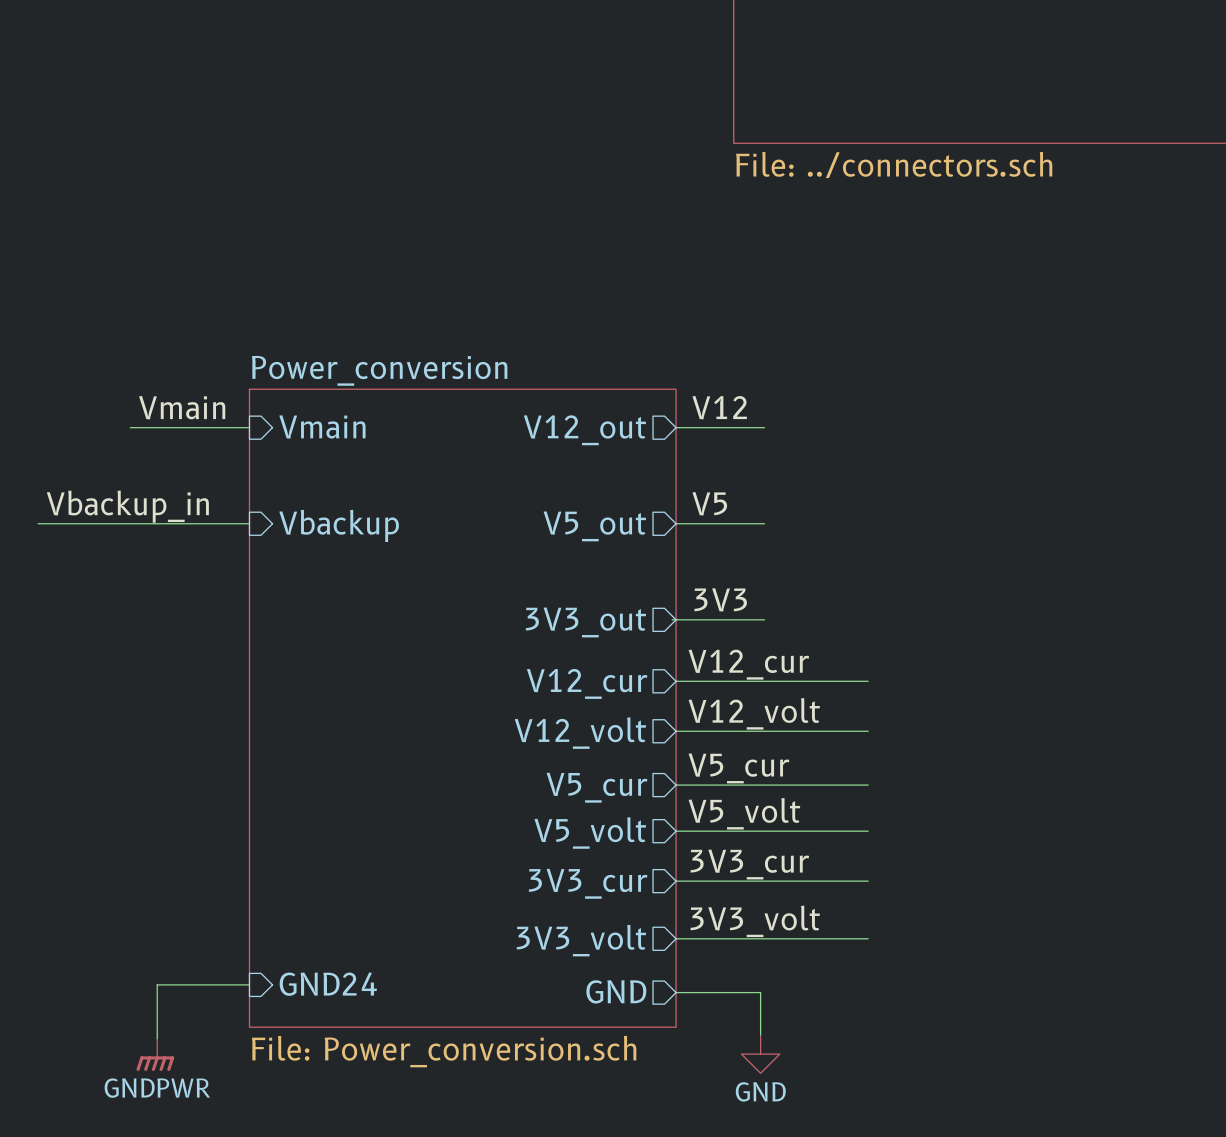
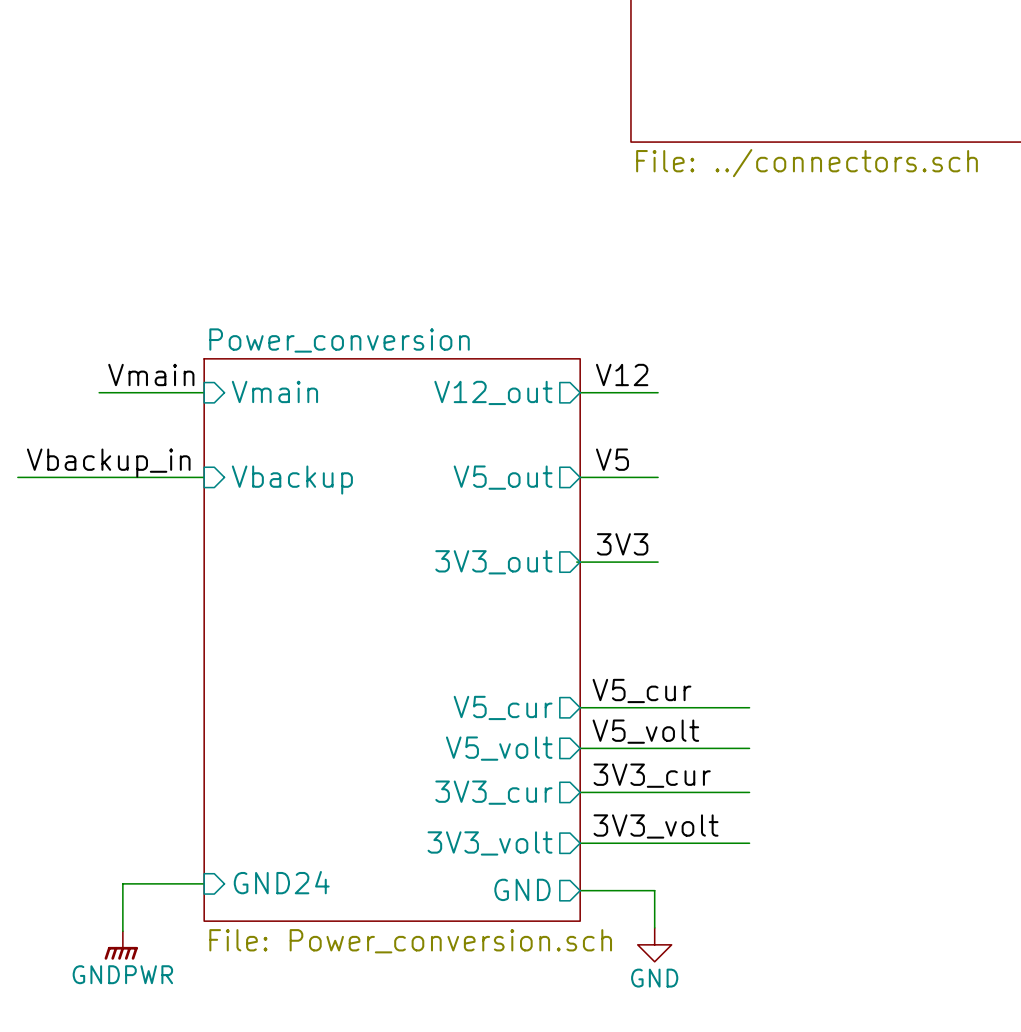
label: V12_cur (748, 664) -> none
wire: (676, 681) (868, 681) -> none
sheet pin: V12_cur (587, 683) -> none
label: V12_volt (754, 713) -> none
wire: (676, 731) (868, 731) -> none
sheet pin: V12_volt (580, 733) -> none

